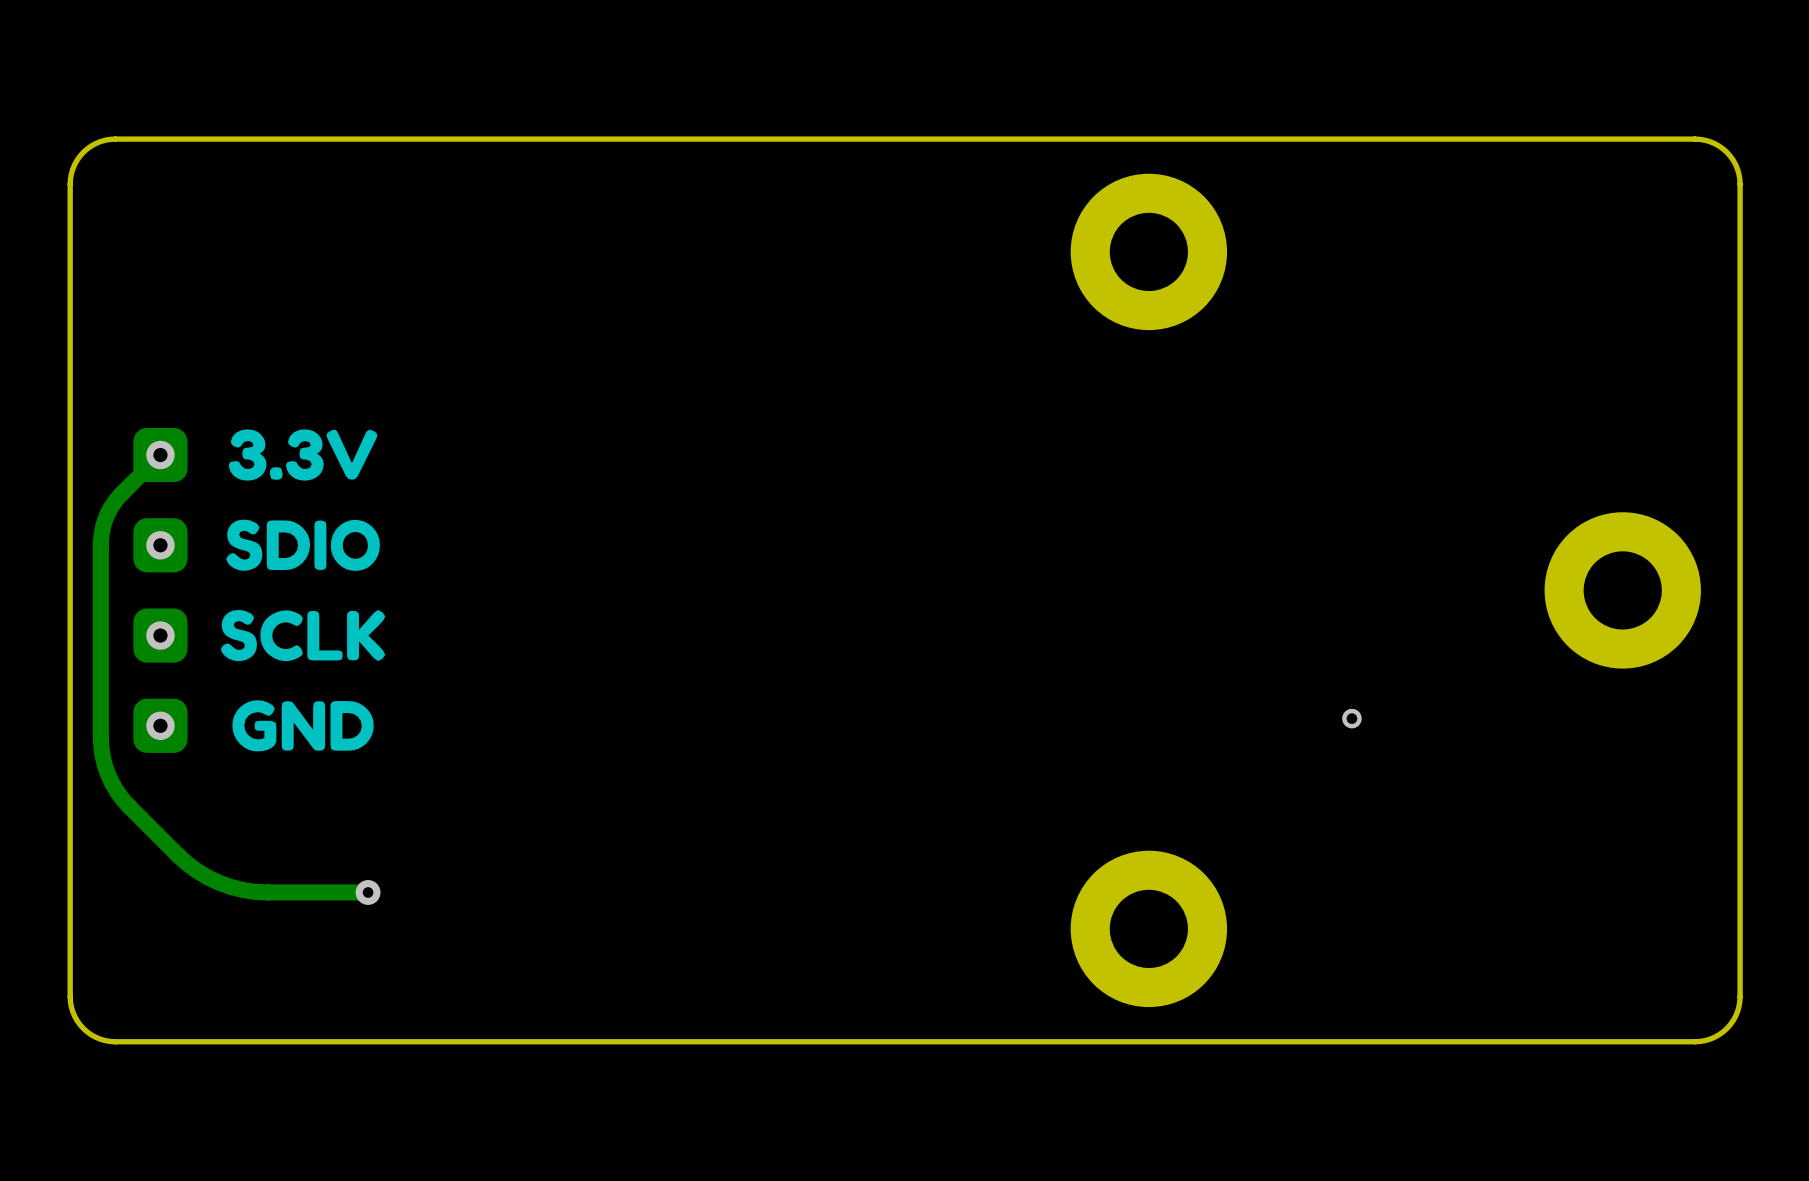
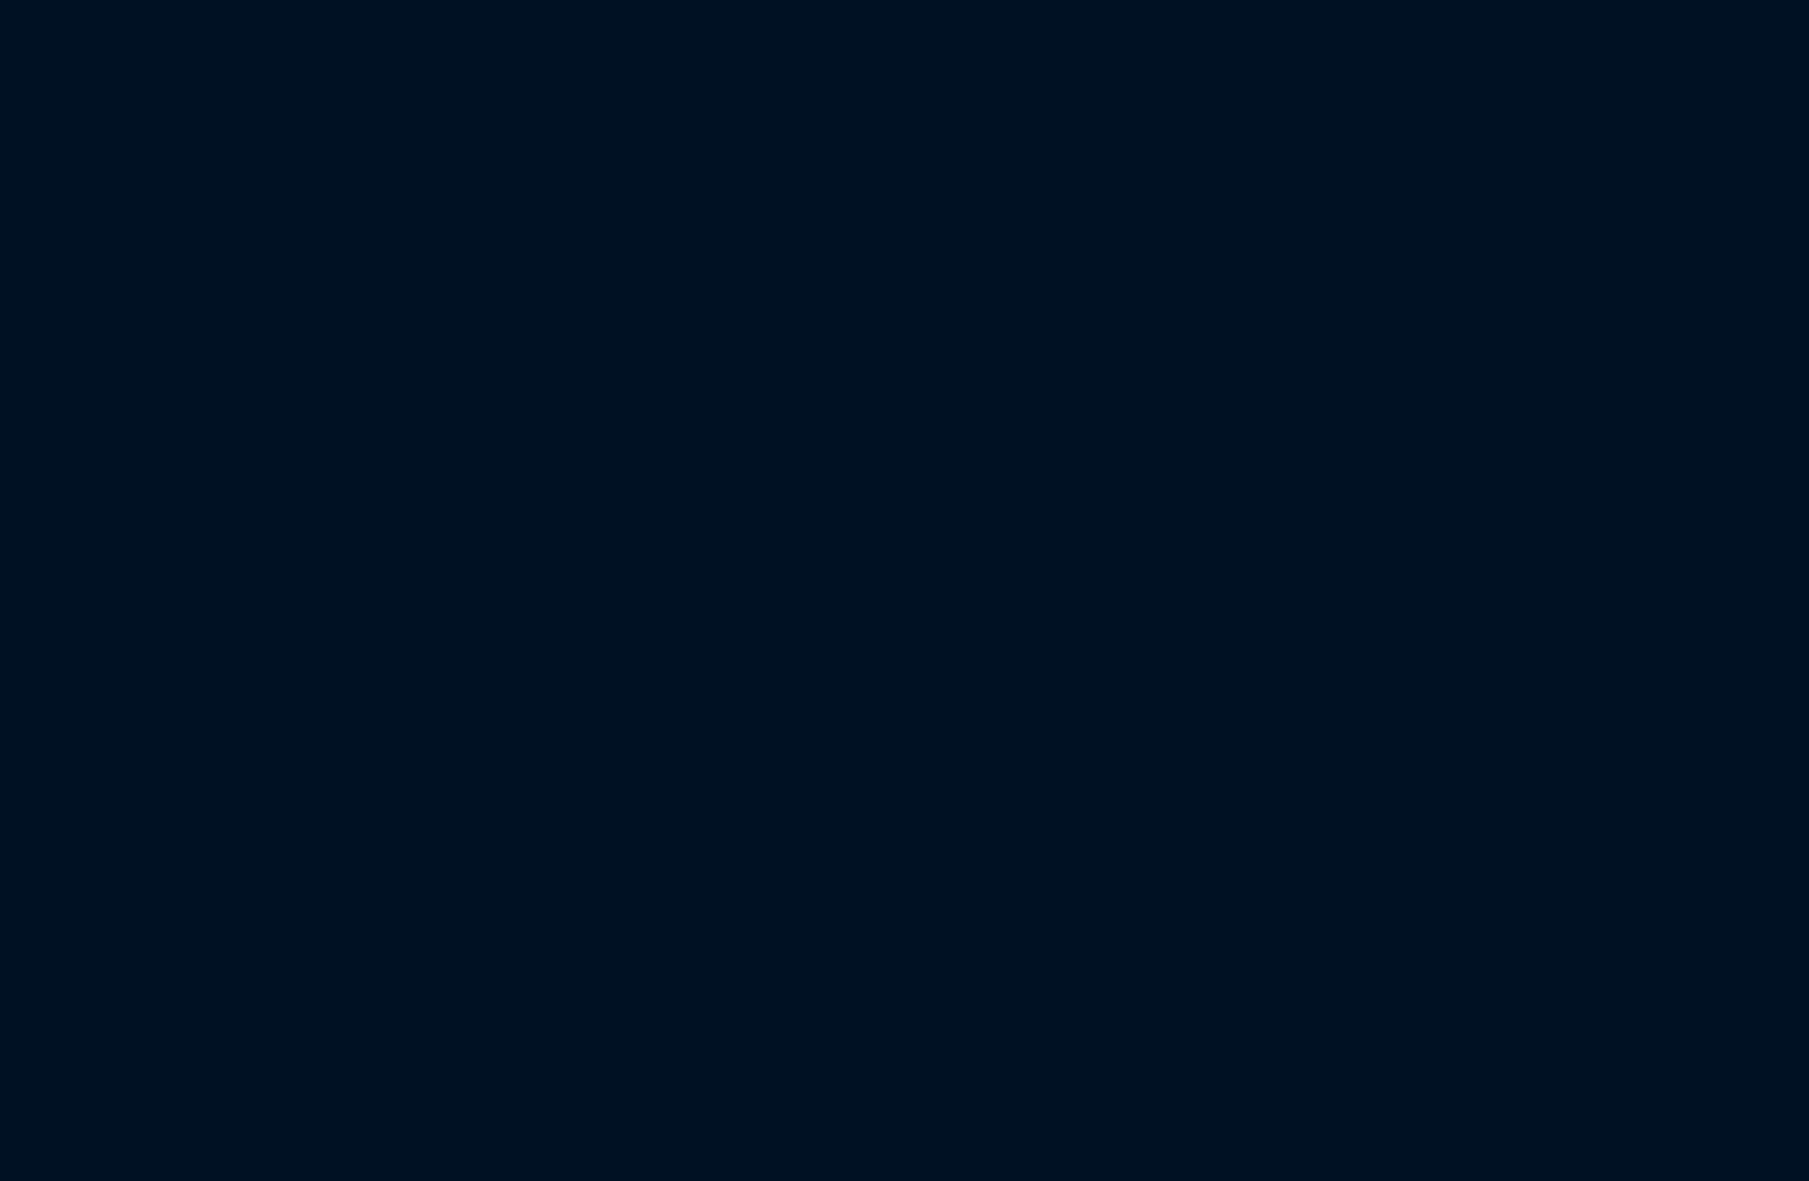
board edge: (1694, 139) (115, 139) (95, 143) (87, 148) (77, 160) (72, 169) (70, 184) (70, 996) (74, 1016) (83, 1028) (91, 1034) (100, 1039) (115, 1041) (1694, 1041) (1714, 1037) (1723, 1031) (1733, 1020) (1737, 1011) (1740, 996) (1740, 184) (1737, 169) (1726, 152) (1714, 143) (1694, 139) -> none
part: (1148, 251) -> none
drawing: [220, 429, 386, 752] -> none
track: (160, 455) (115, 500) (106, 516) (101, 534) (100, 737) (105, 766) (112, 783) (129, 806) (177, 855) (197, 871) (219, 882) (255, 891) (368, 892) -> none
via: (160, 455) -> none
via: (160, 545) -> none
part: (160, 590) -> none
part: (1622, 590) -> none
via: (160, 635) -> none
via: (1351, 718) -> none
via: (160, 725) -> none
via: (368, 892) -> none
part: (1148, 928) -> none

